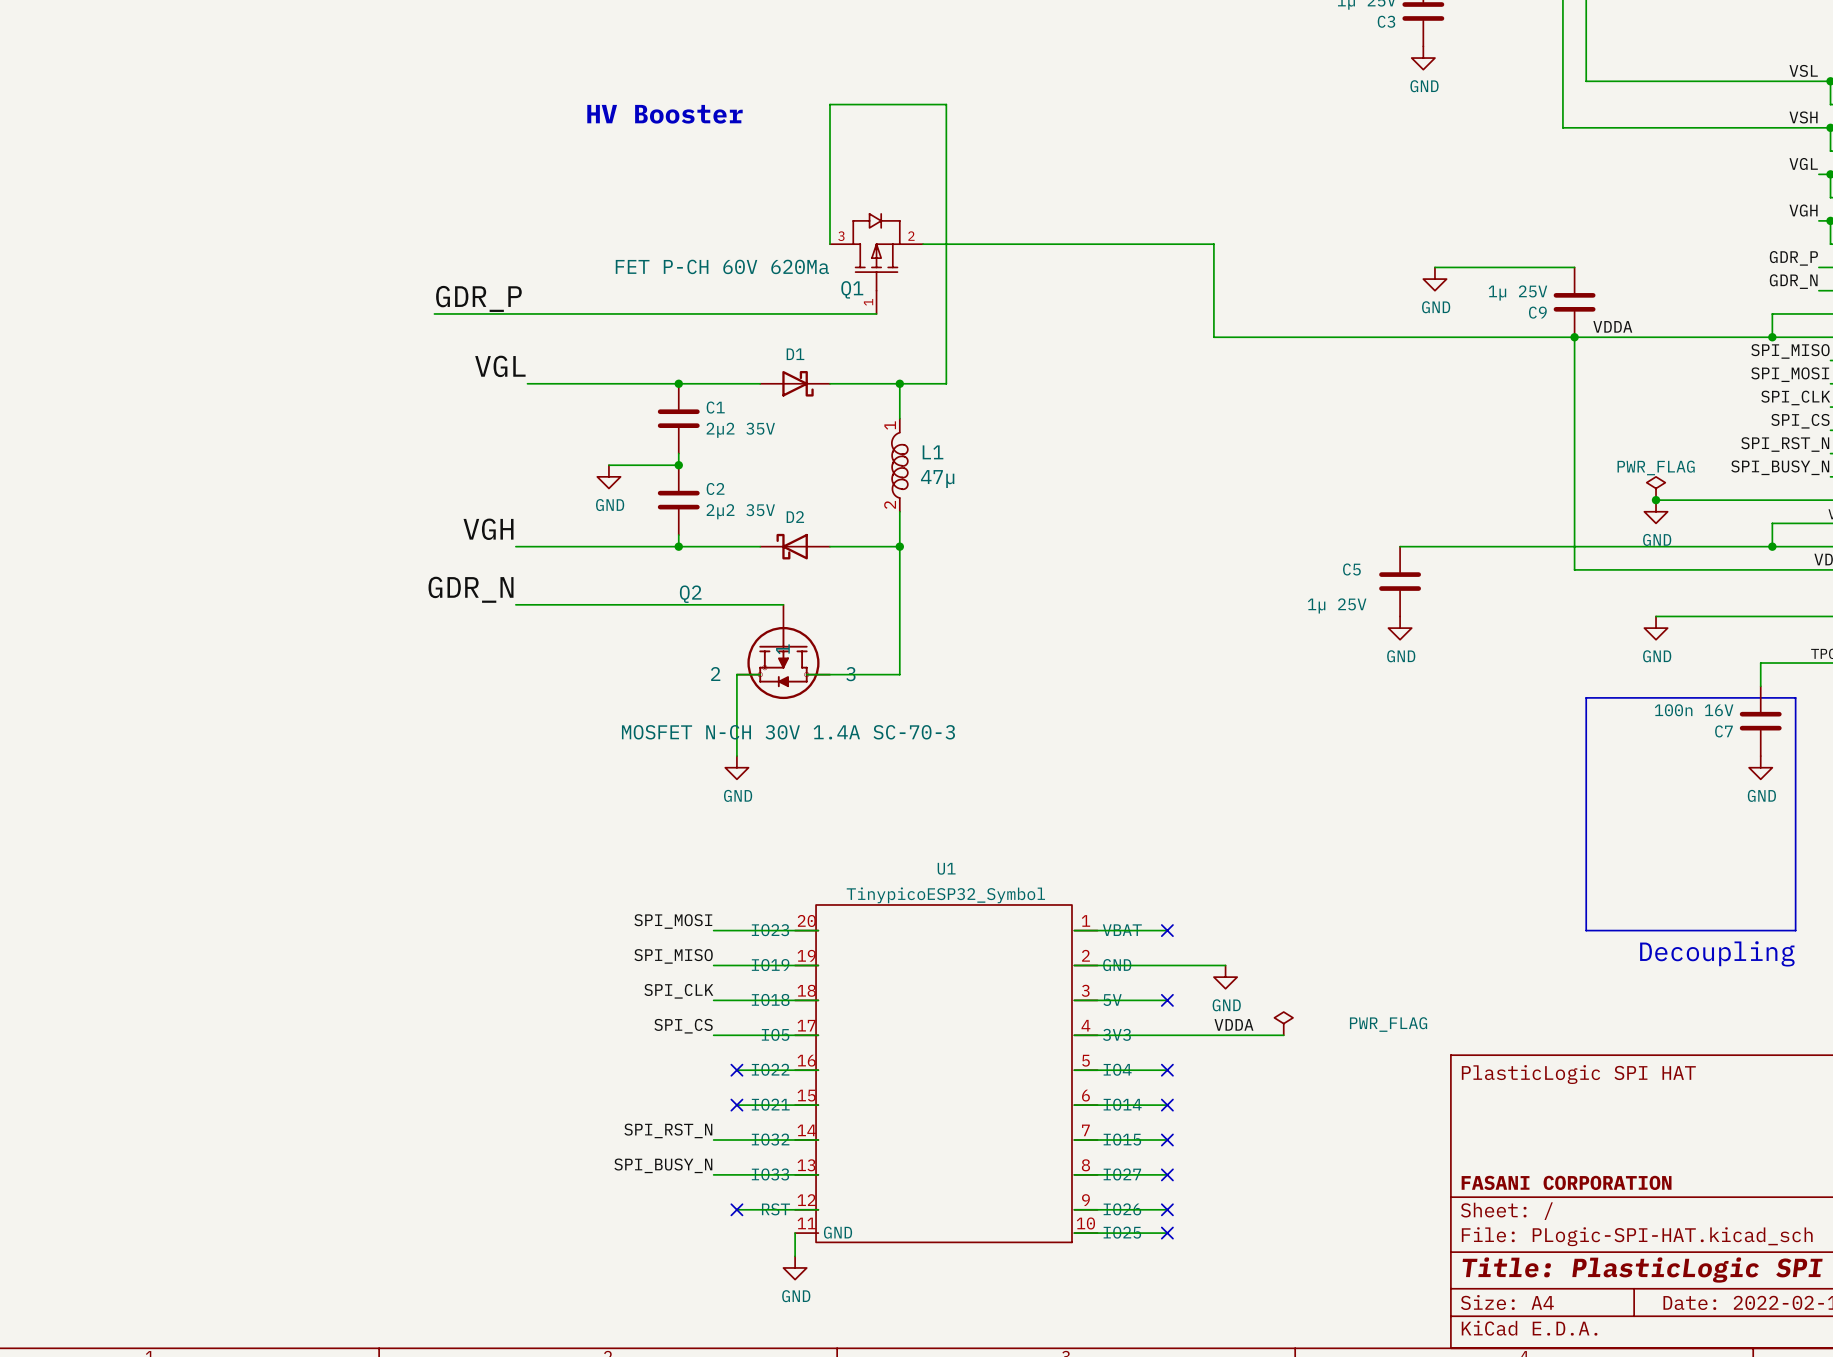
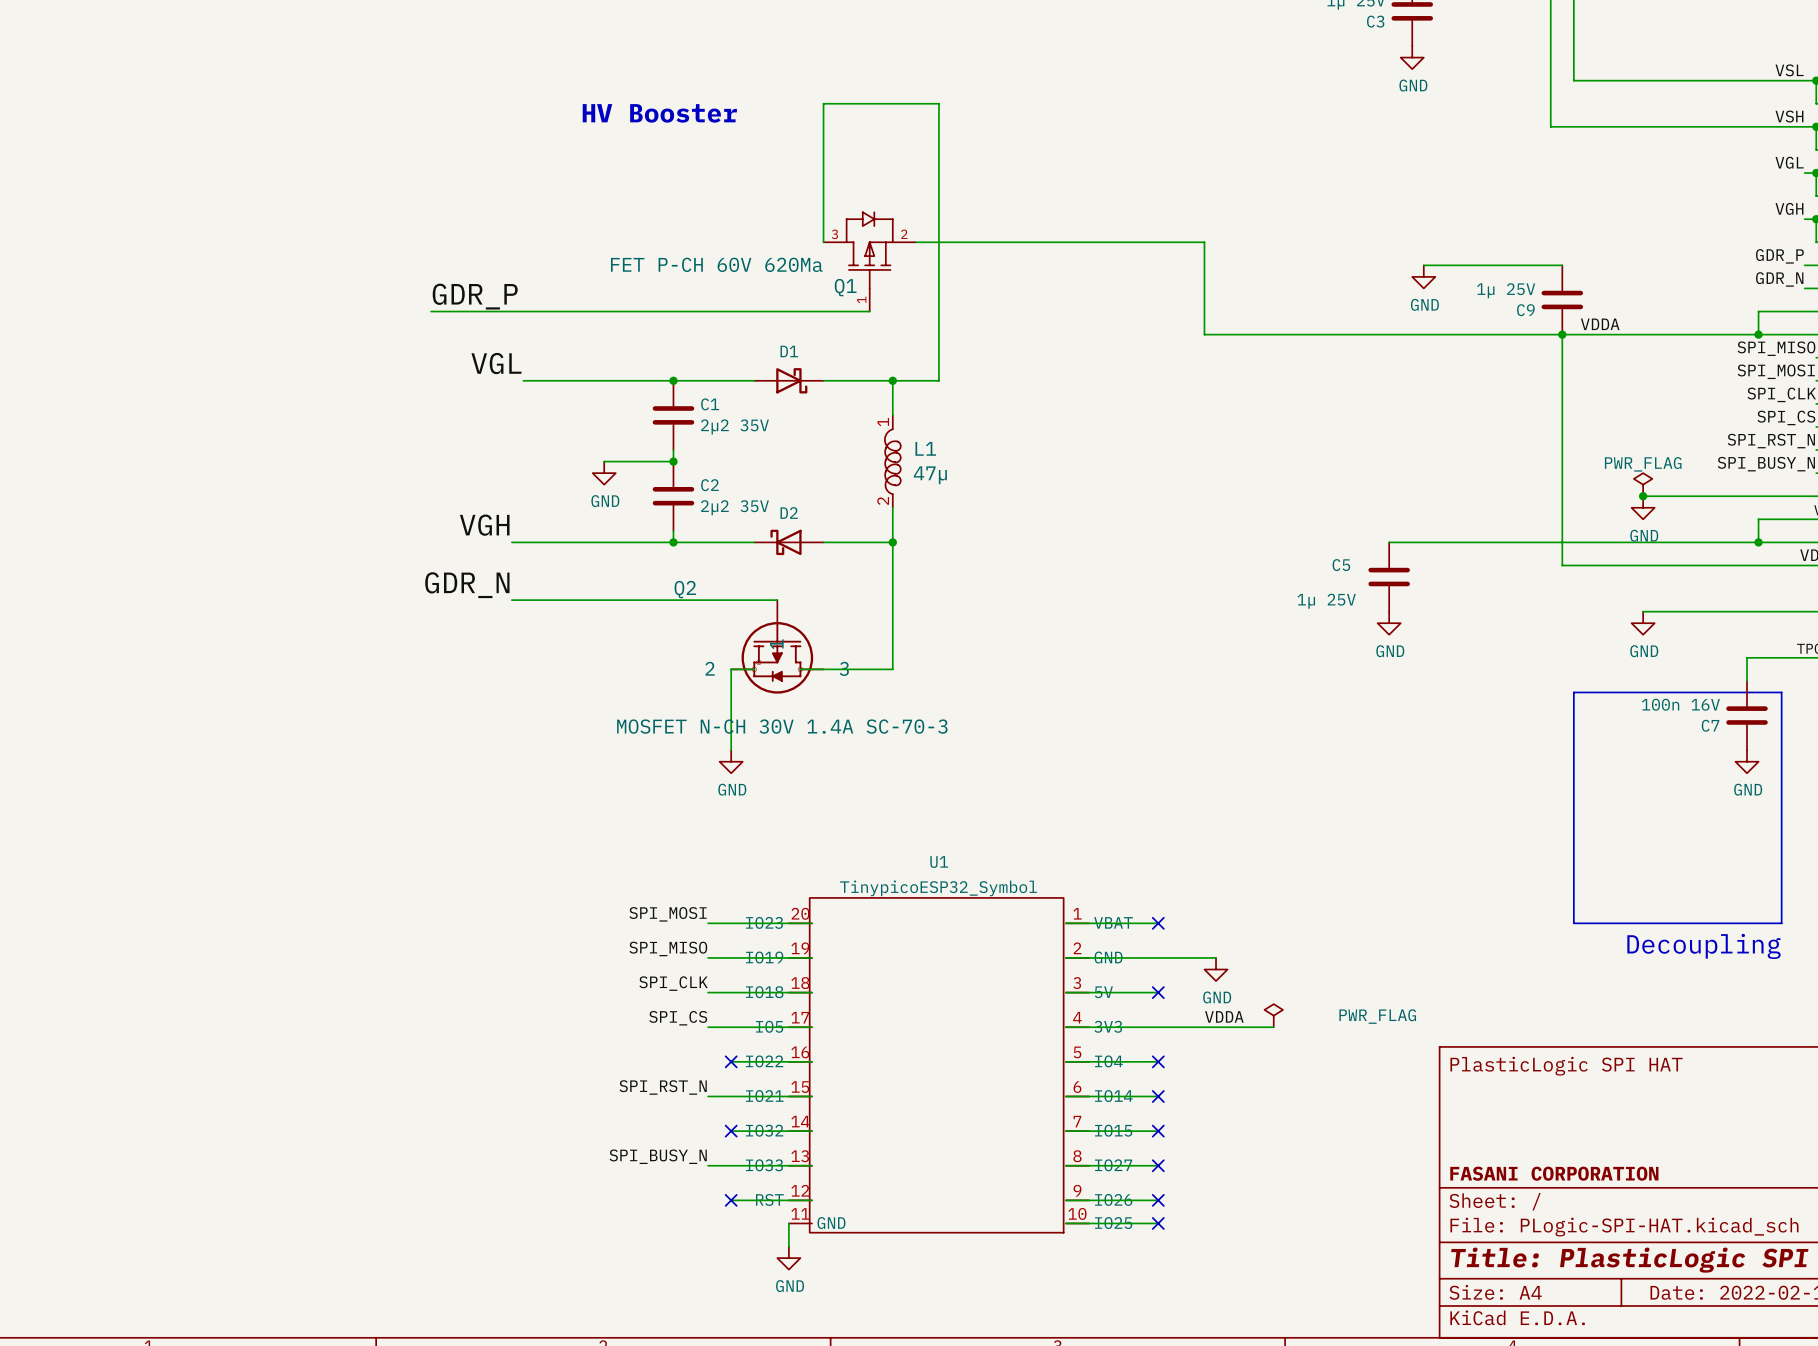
no-connect mark position: (736, 1105) -> (731, 1131)
label position: SPI_RST_N (668, 1130) -> SPI_RST_N (663, 1087)
wire: (713, 1140) (736, 1140) -> (708, 1096) (731, 1096)

